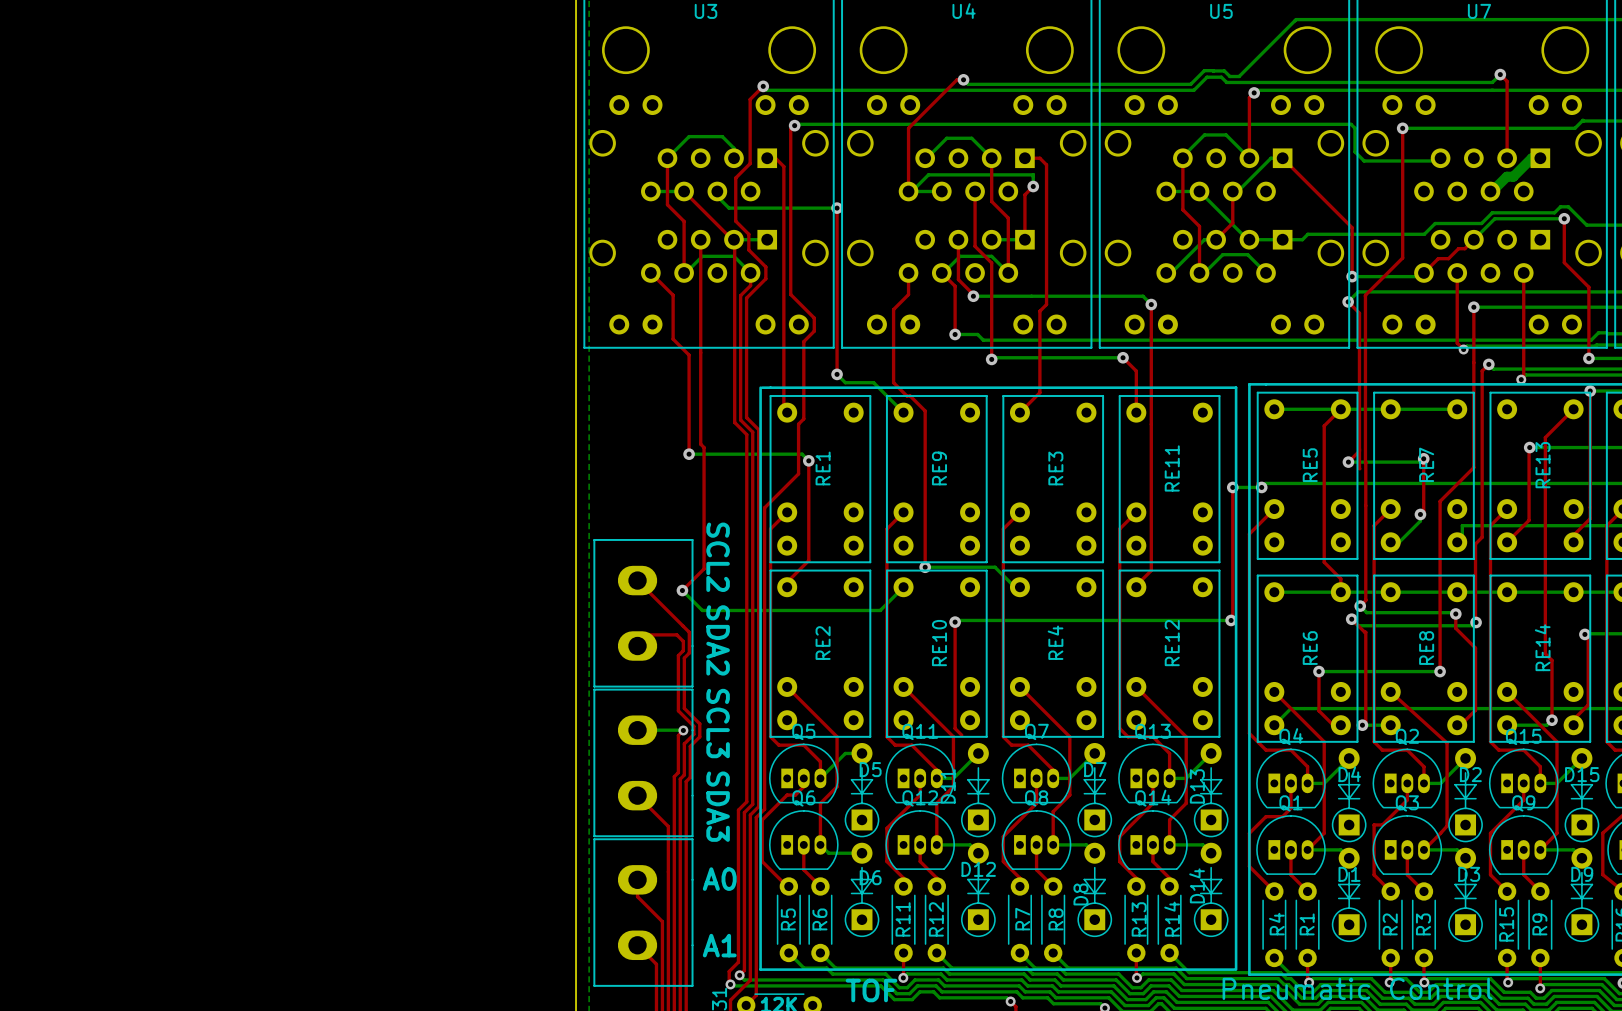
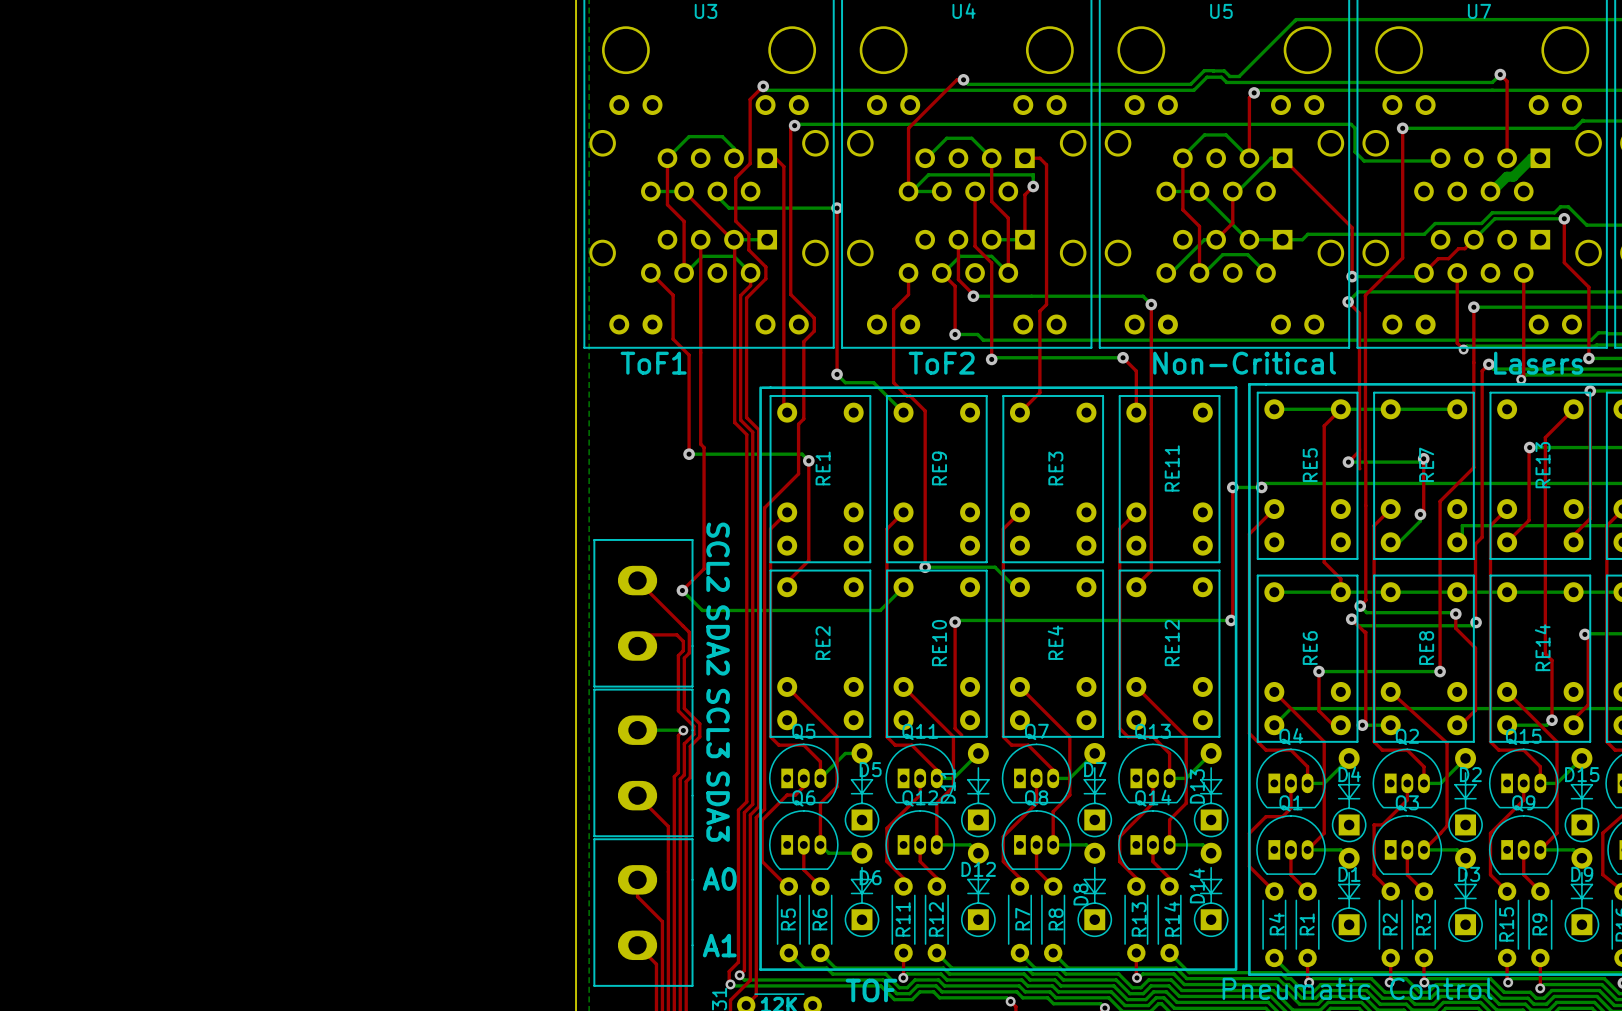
text: none -> ToF1 (653, 363)
text: none -> ToF2 (941, 363)
text: none -> Non-Critical (1244, 363)
text: none -> Lasers (1538, 363)

